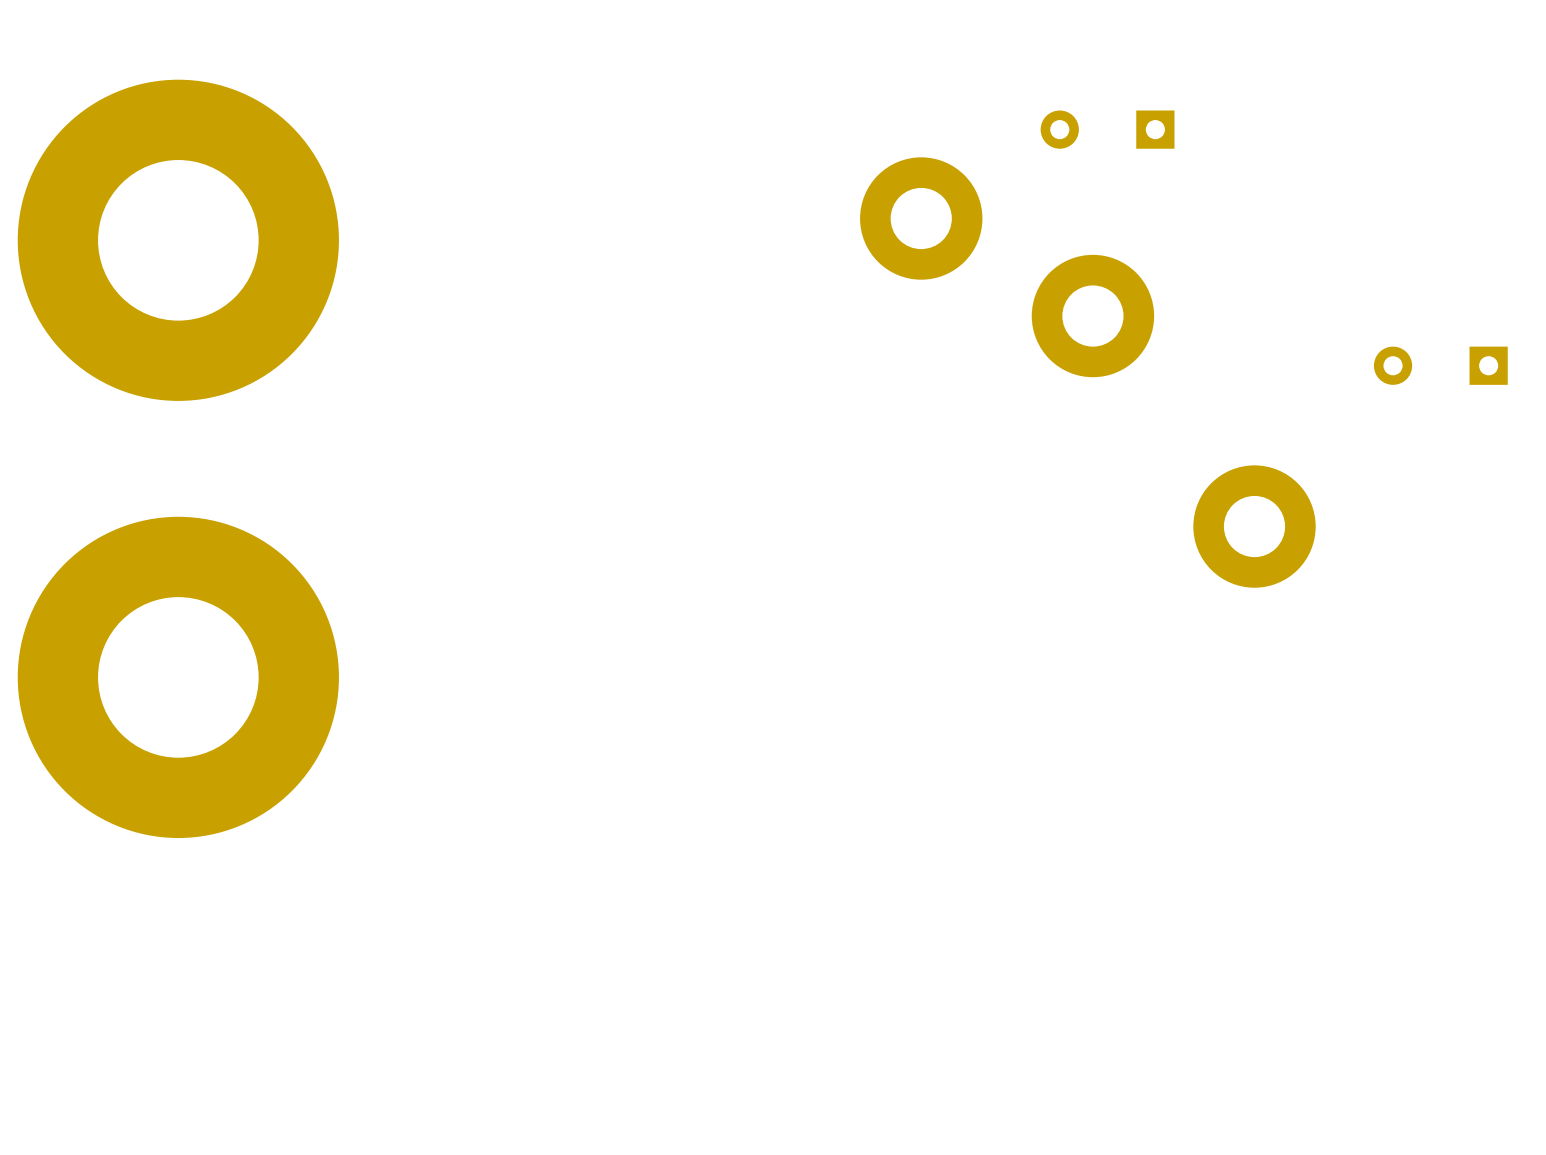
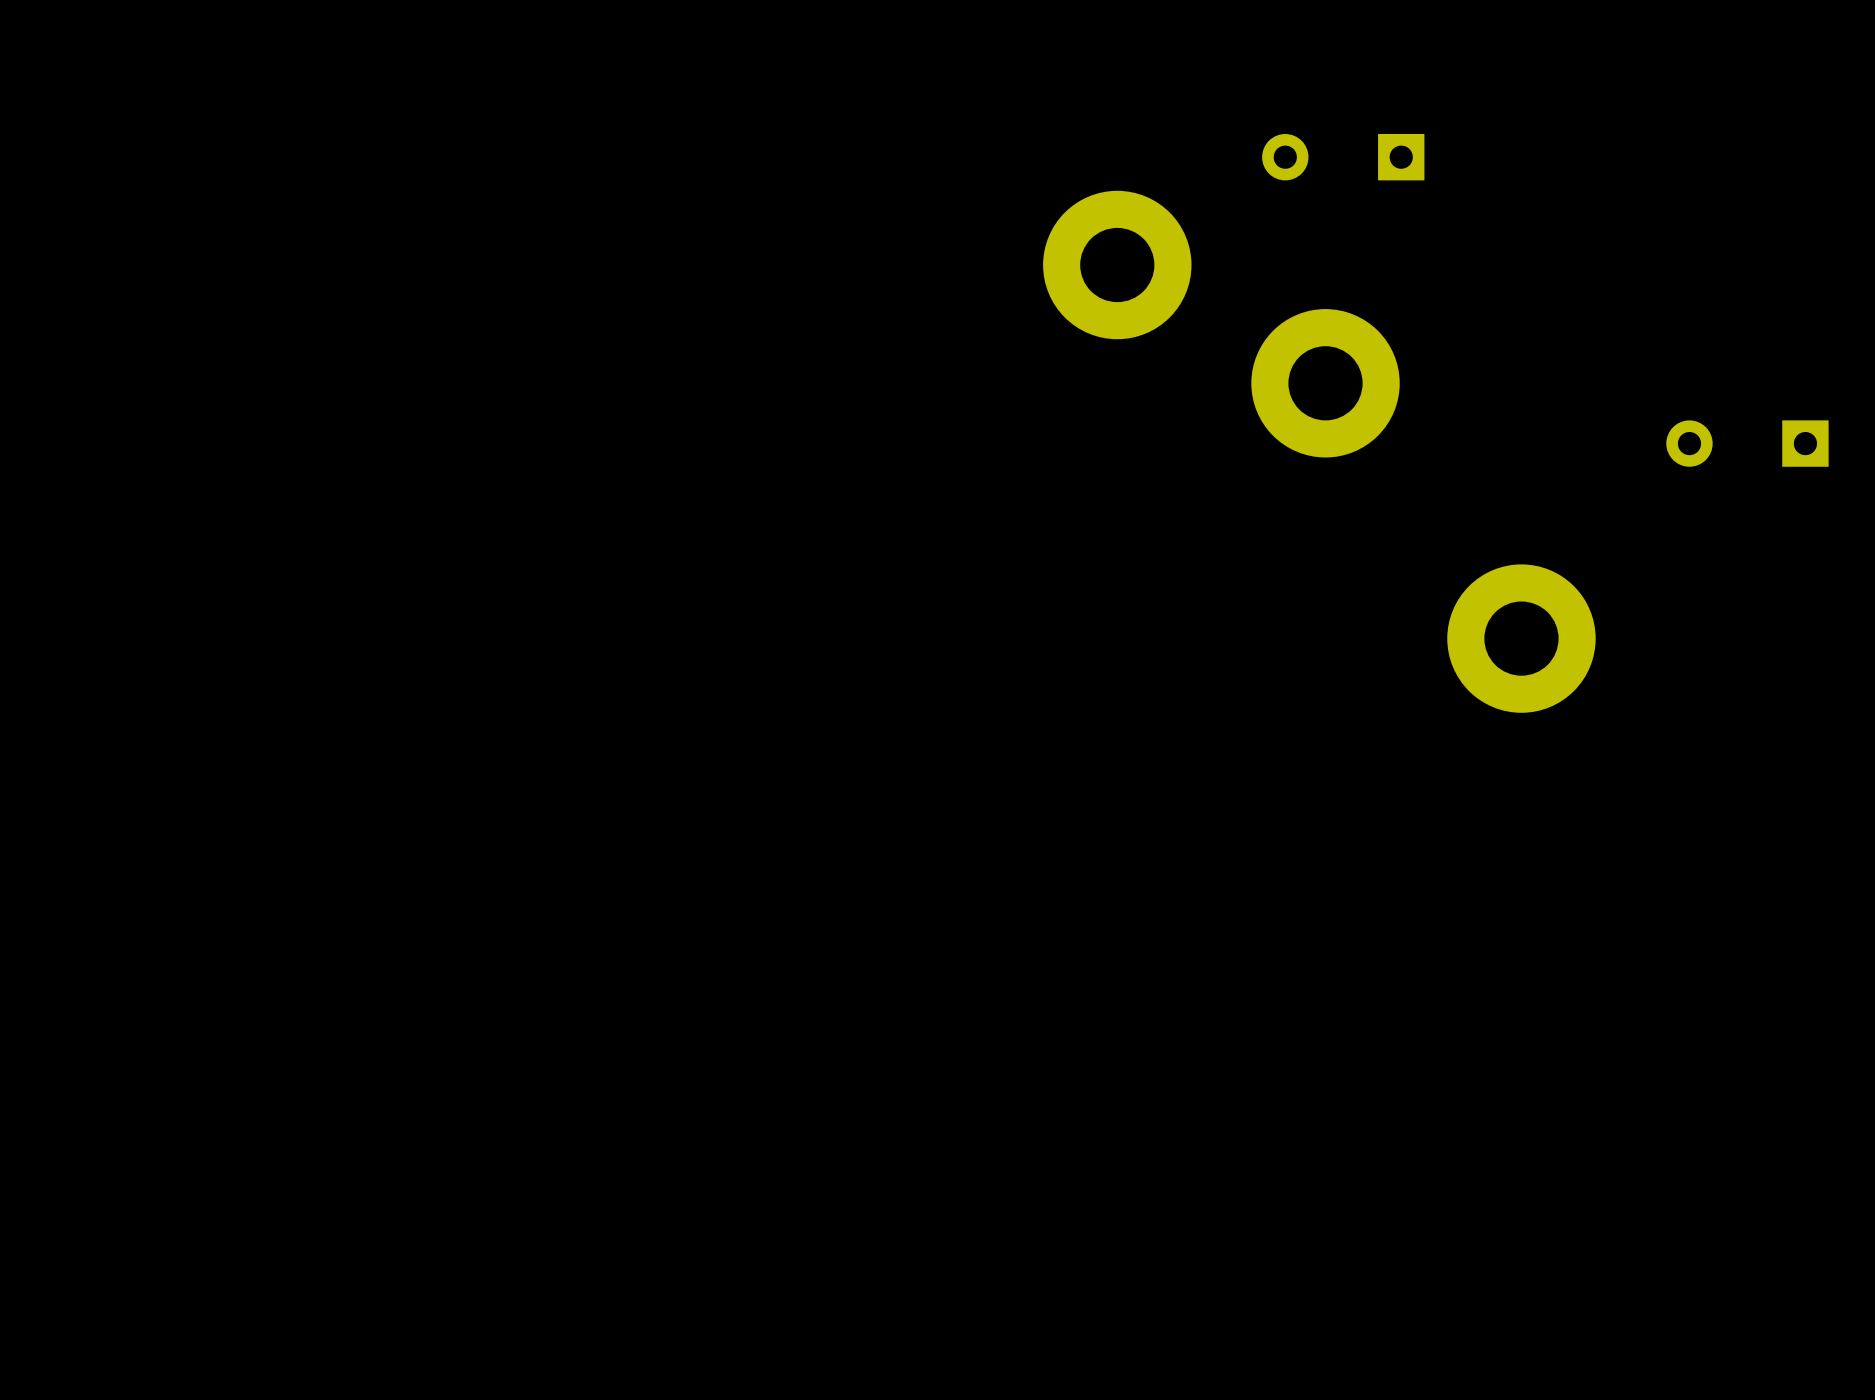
part: (178, 240) -> none
part: (178, 677) -> none

